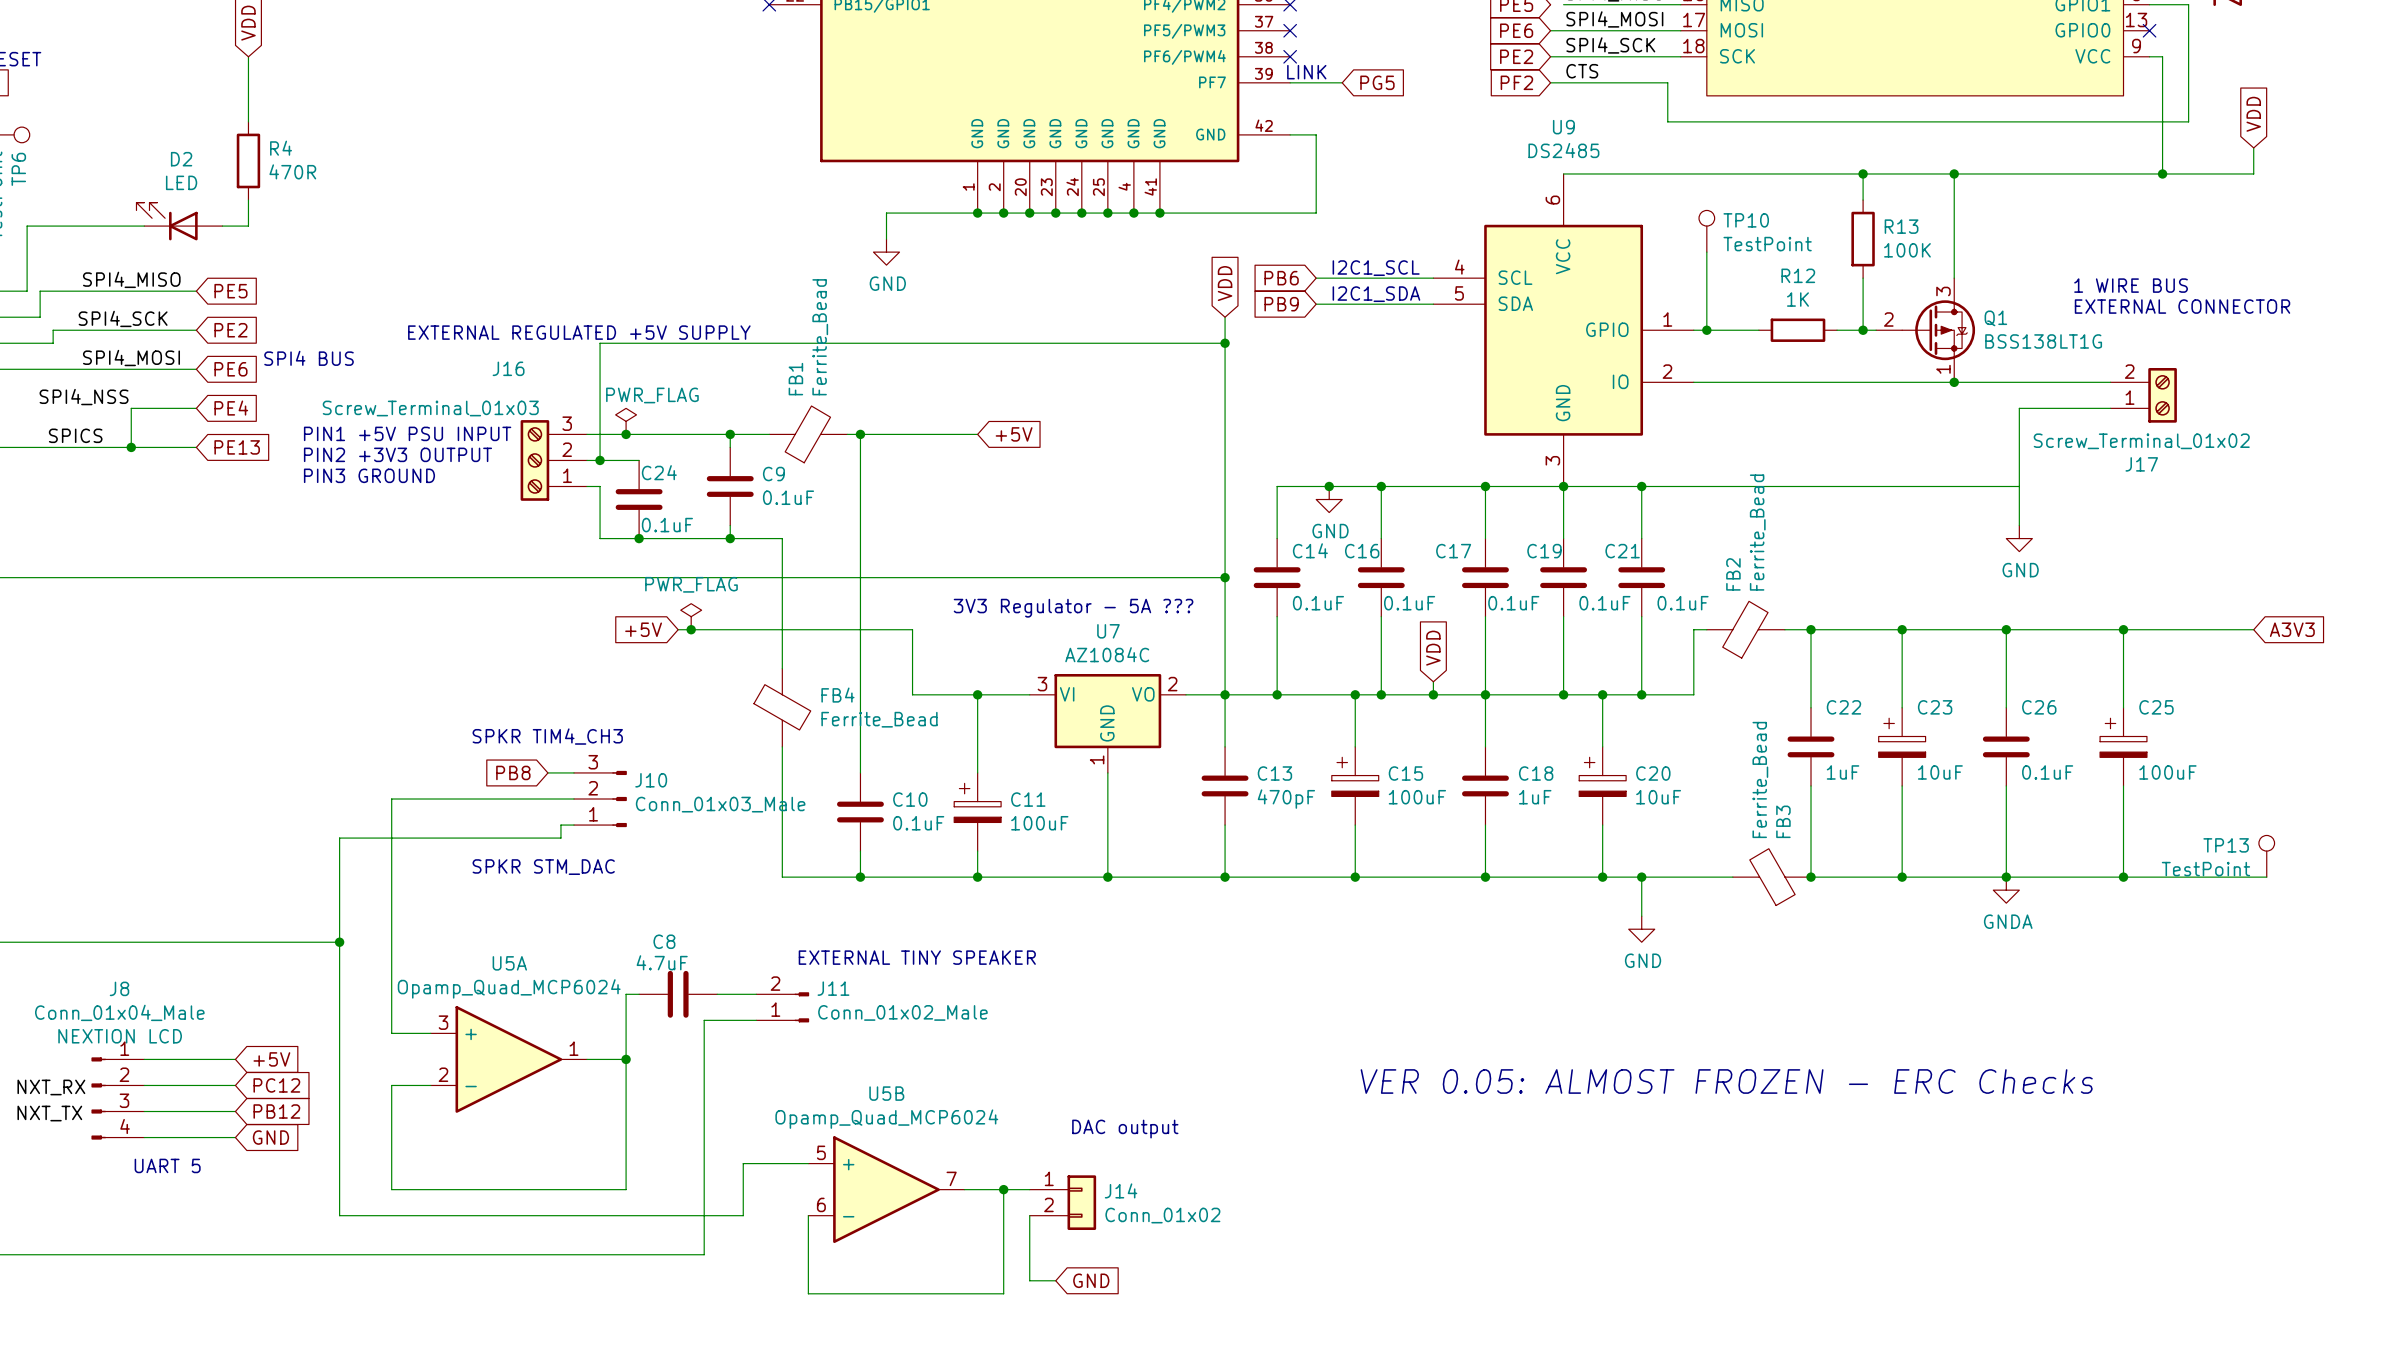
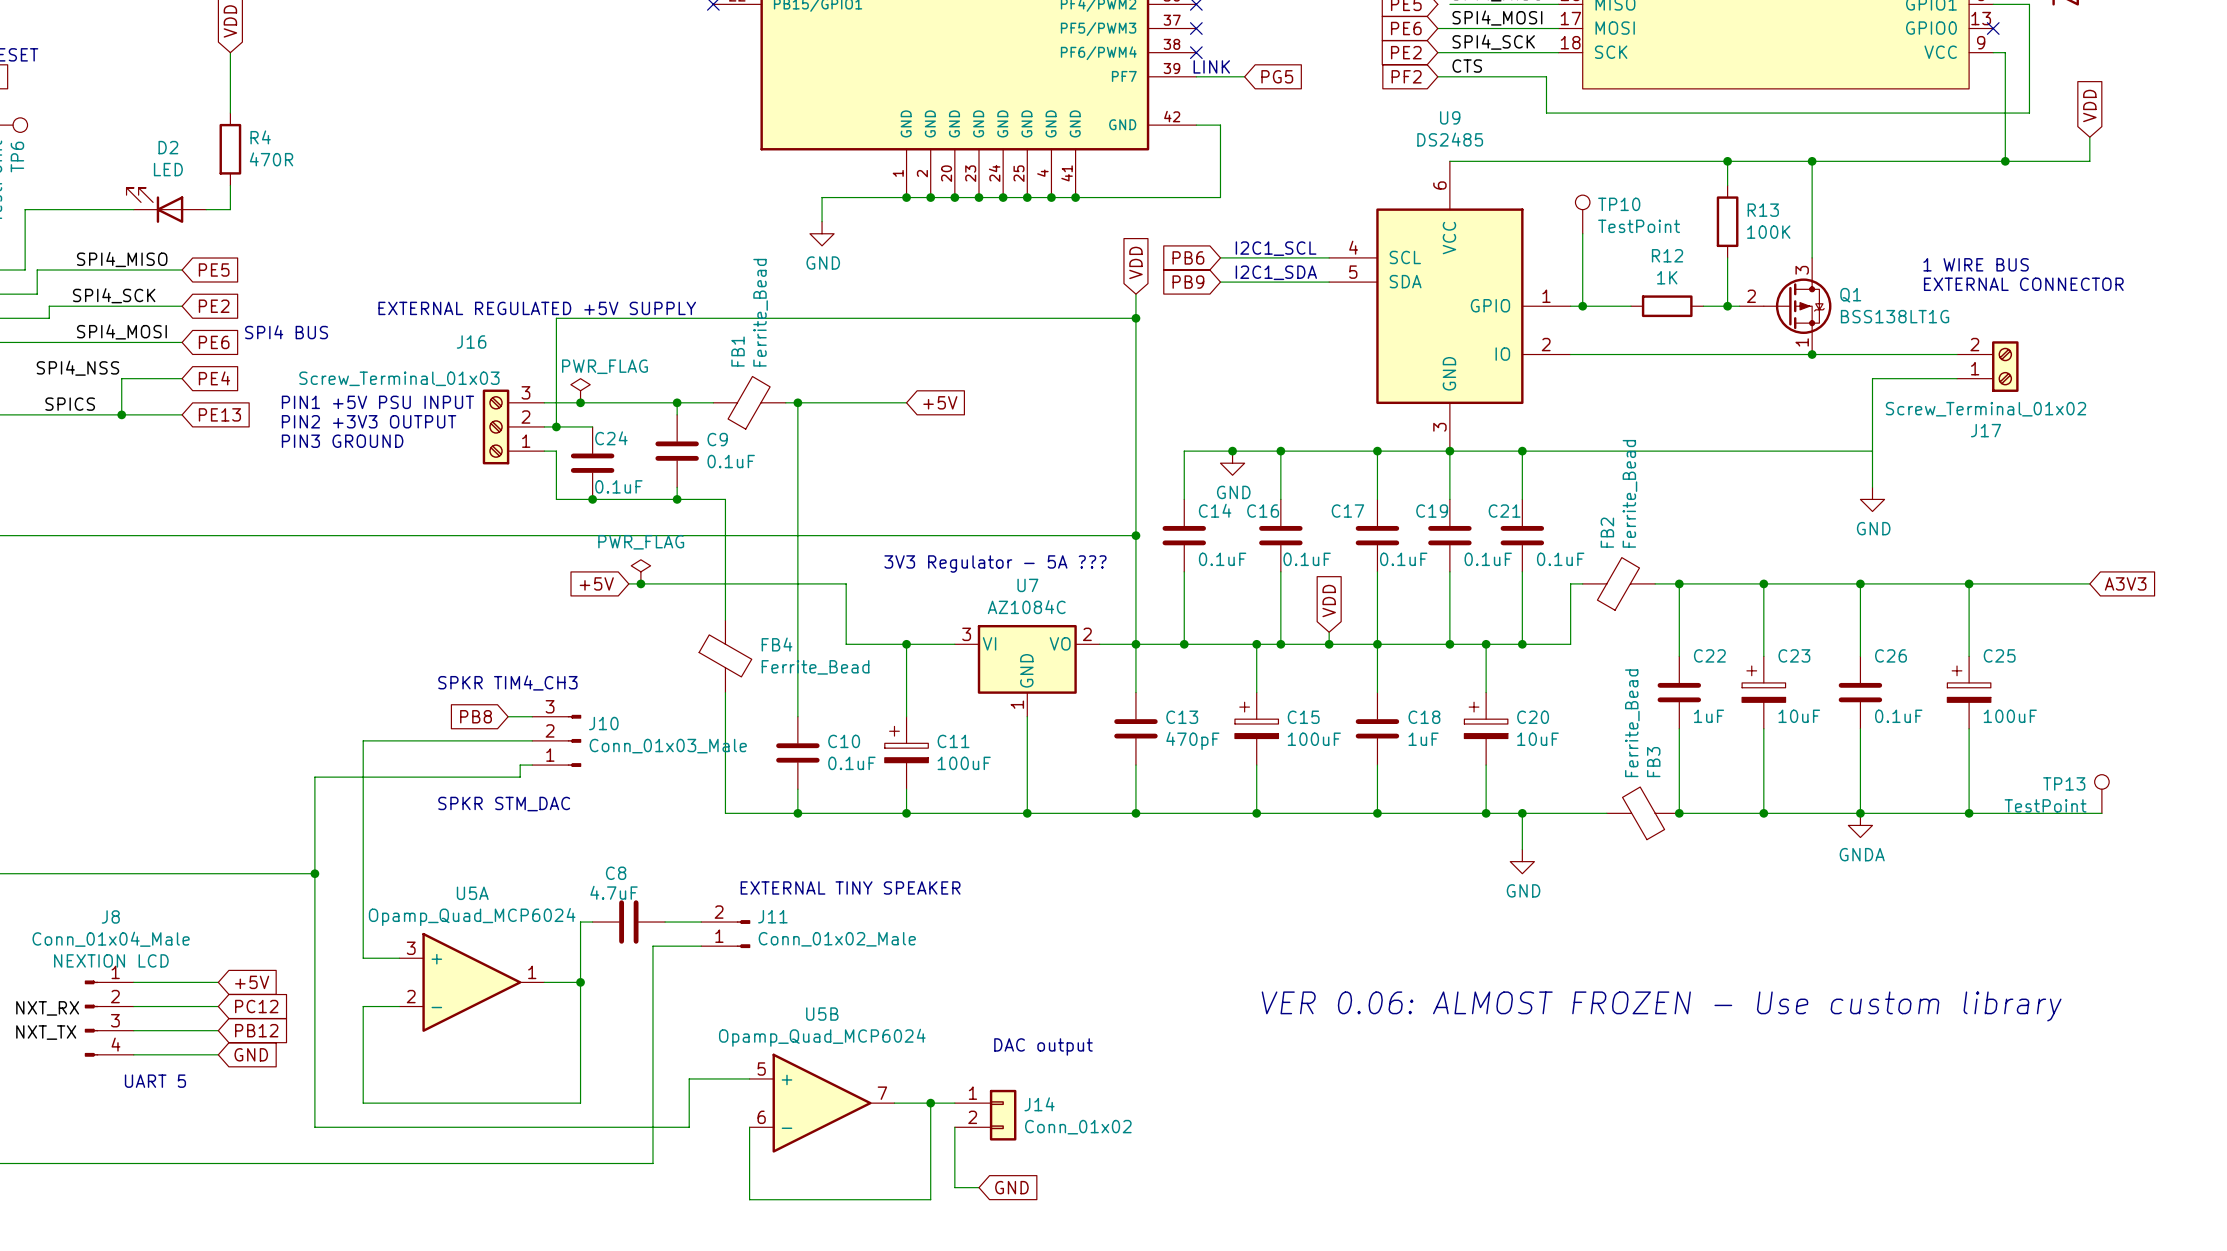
text: VER 0.05: ALMOST FROZEN - ERC Checks (1726, 1081) -> VER 0.06: ALMOST FROZEN - Use custom library (1661, 1006)

